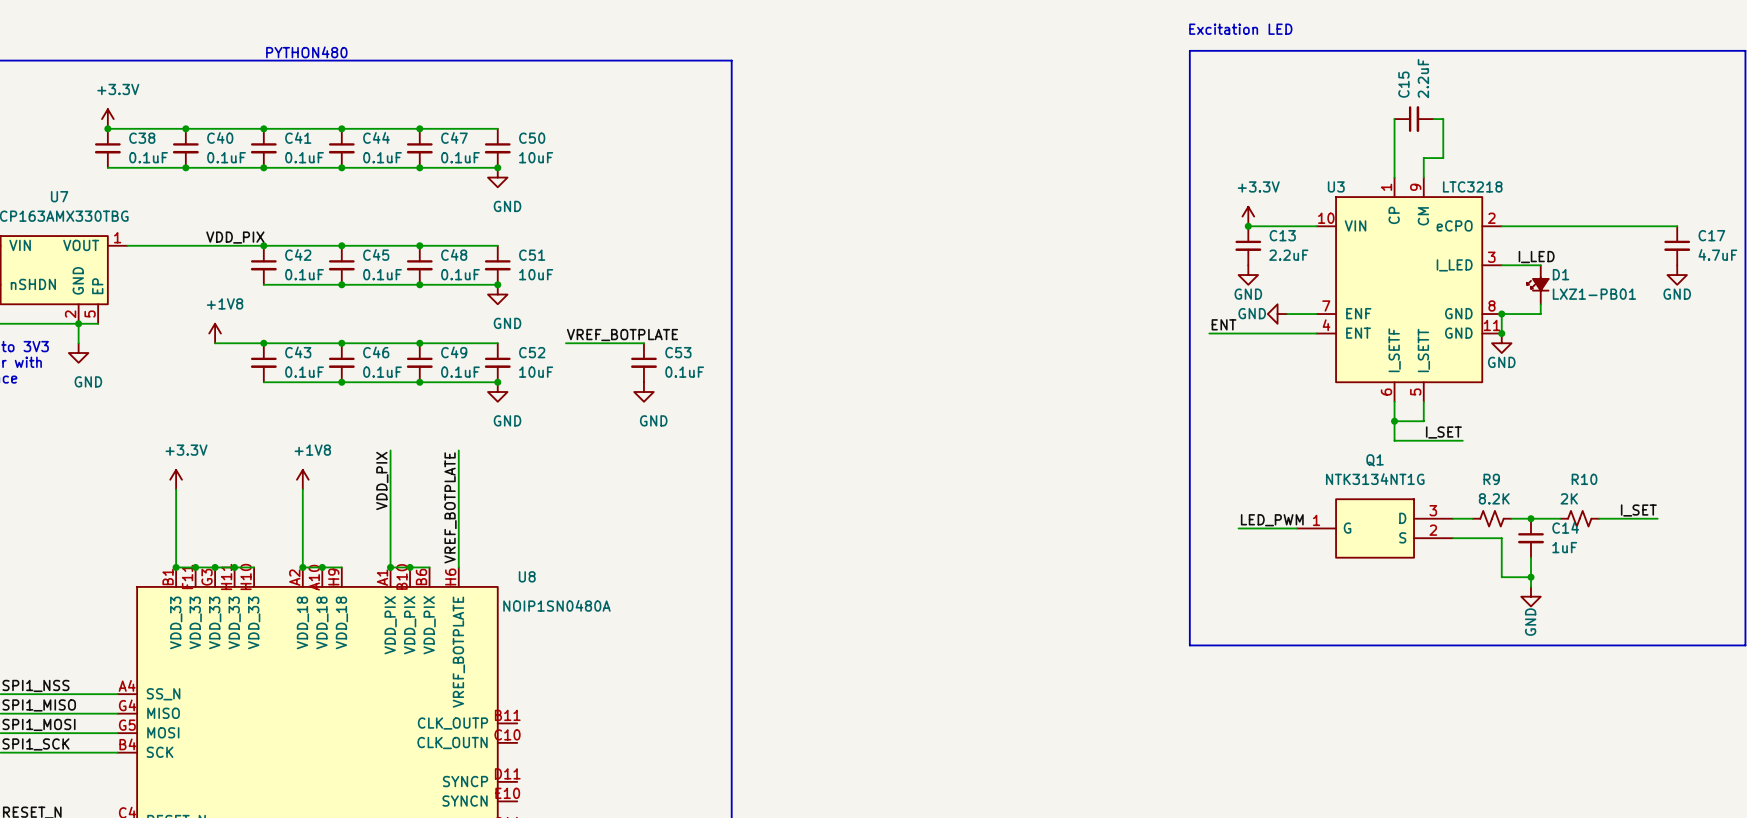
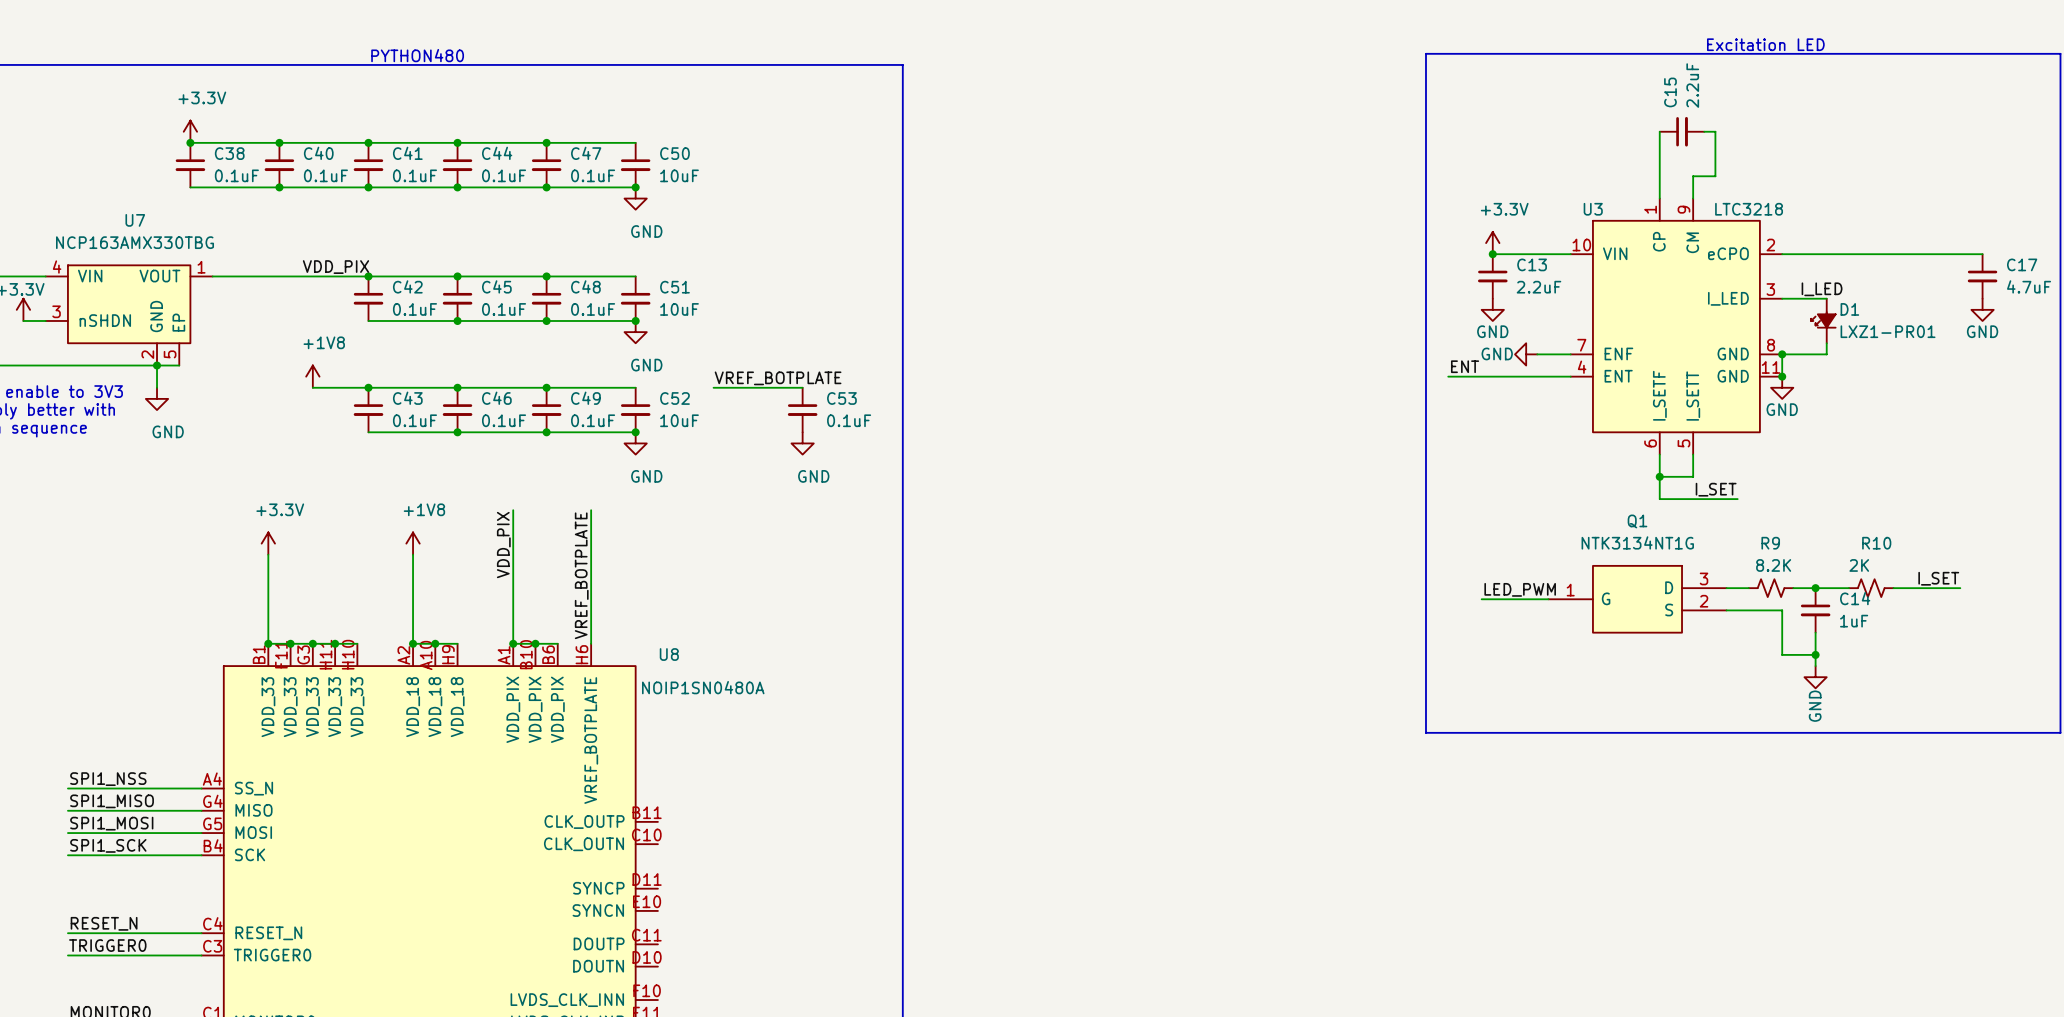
text: Excitation LED (1240, 29) -> none
text: none -> Excitation LED (1765, 44)
D1 value: LXZ1-PB01 (1594, 294) -> LXZ1-PR01 (1888, 331)

